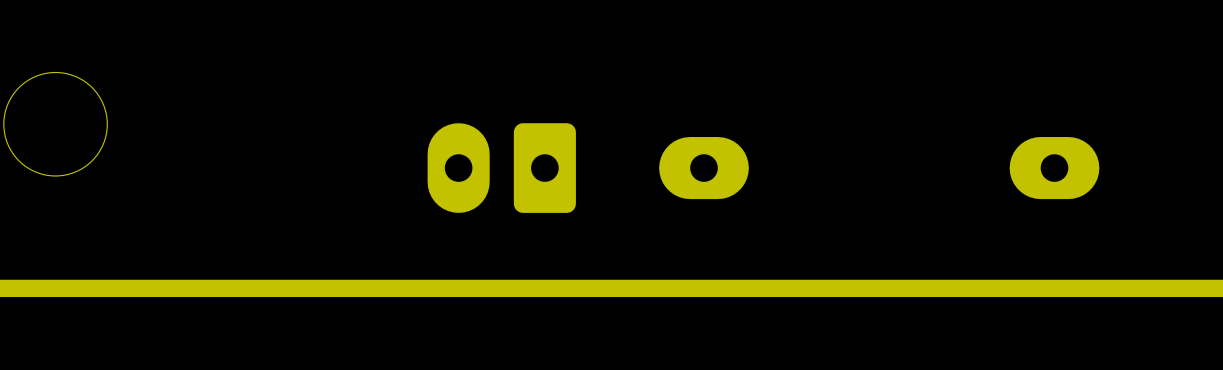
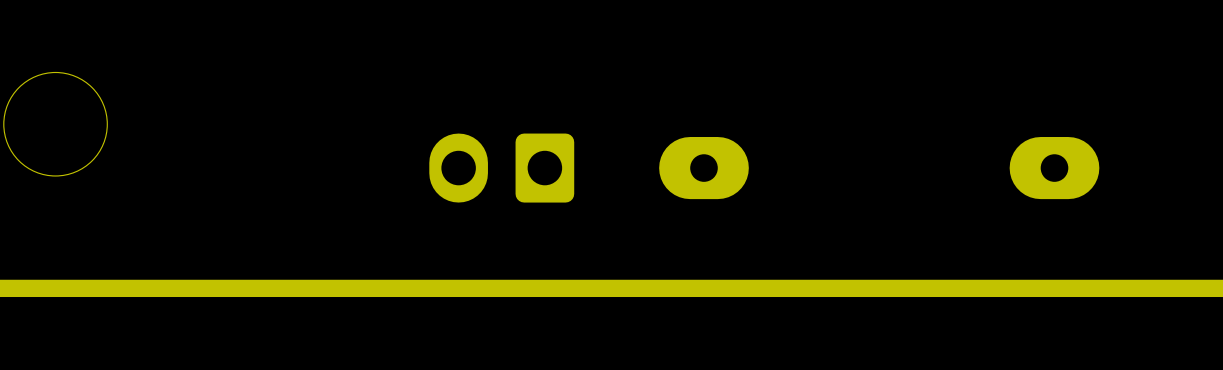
part footprint: [427, 123, 576, 213] -> [429, 133, 575, 203]

